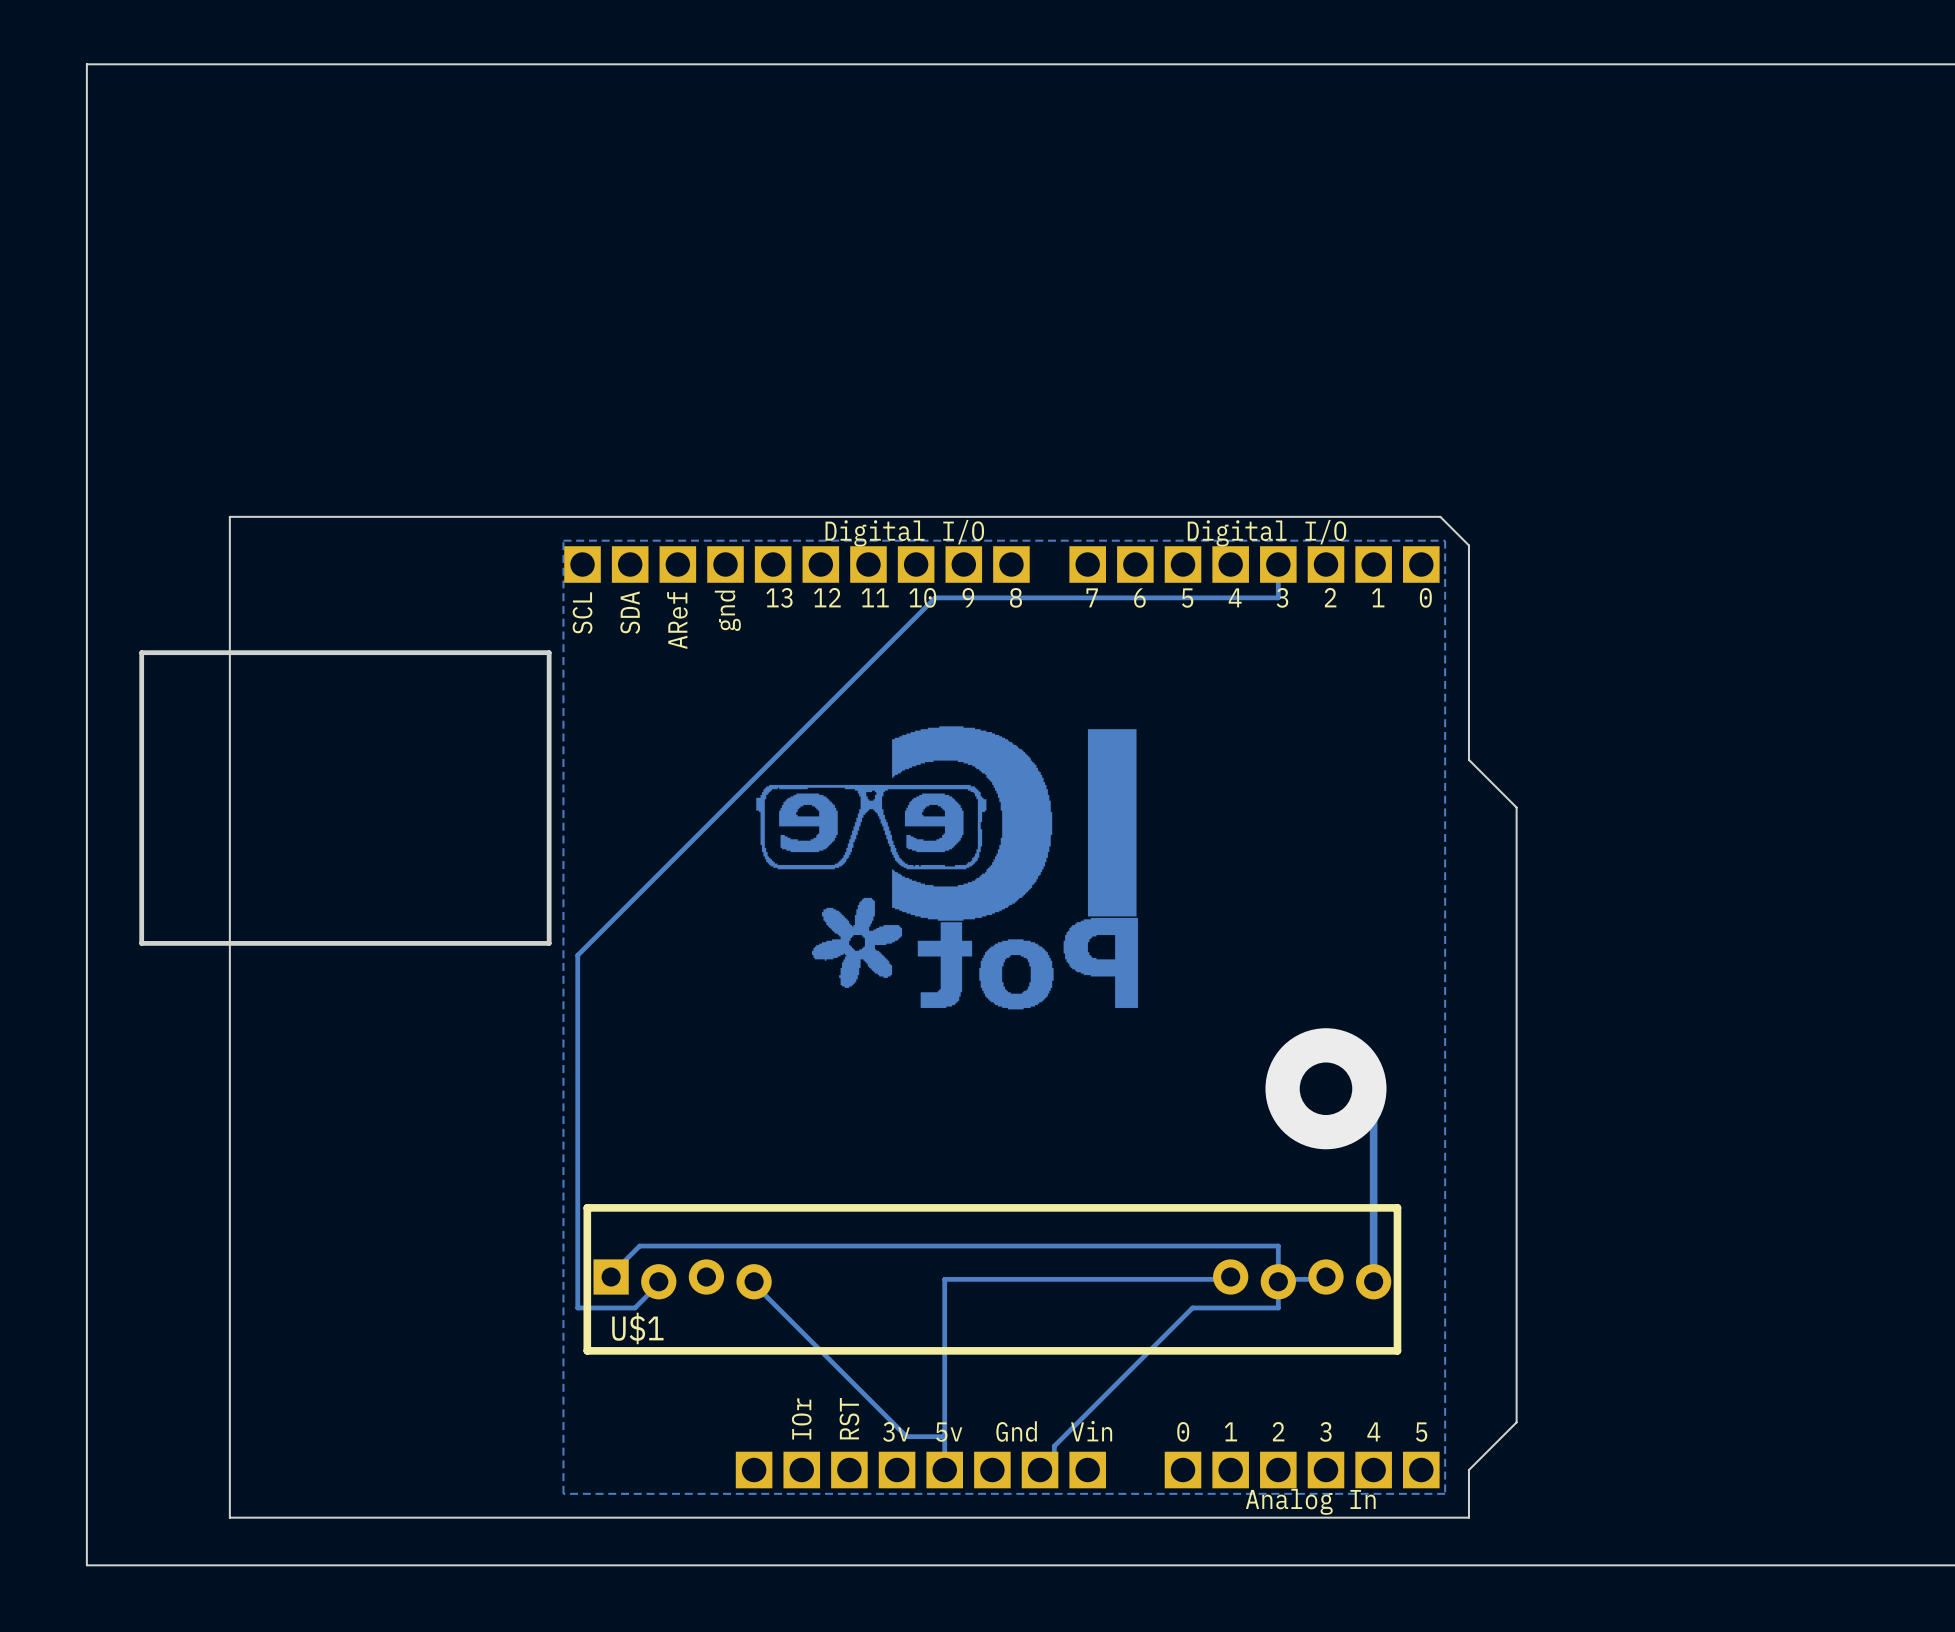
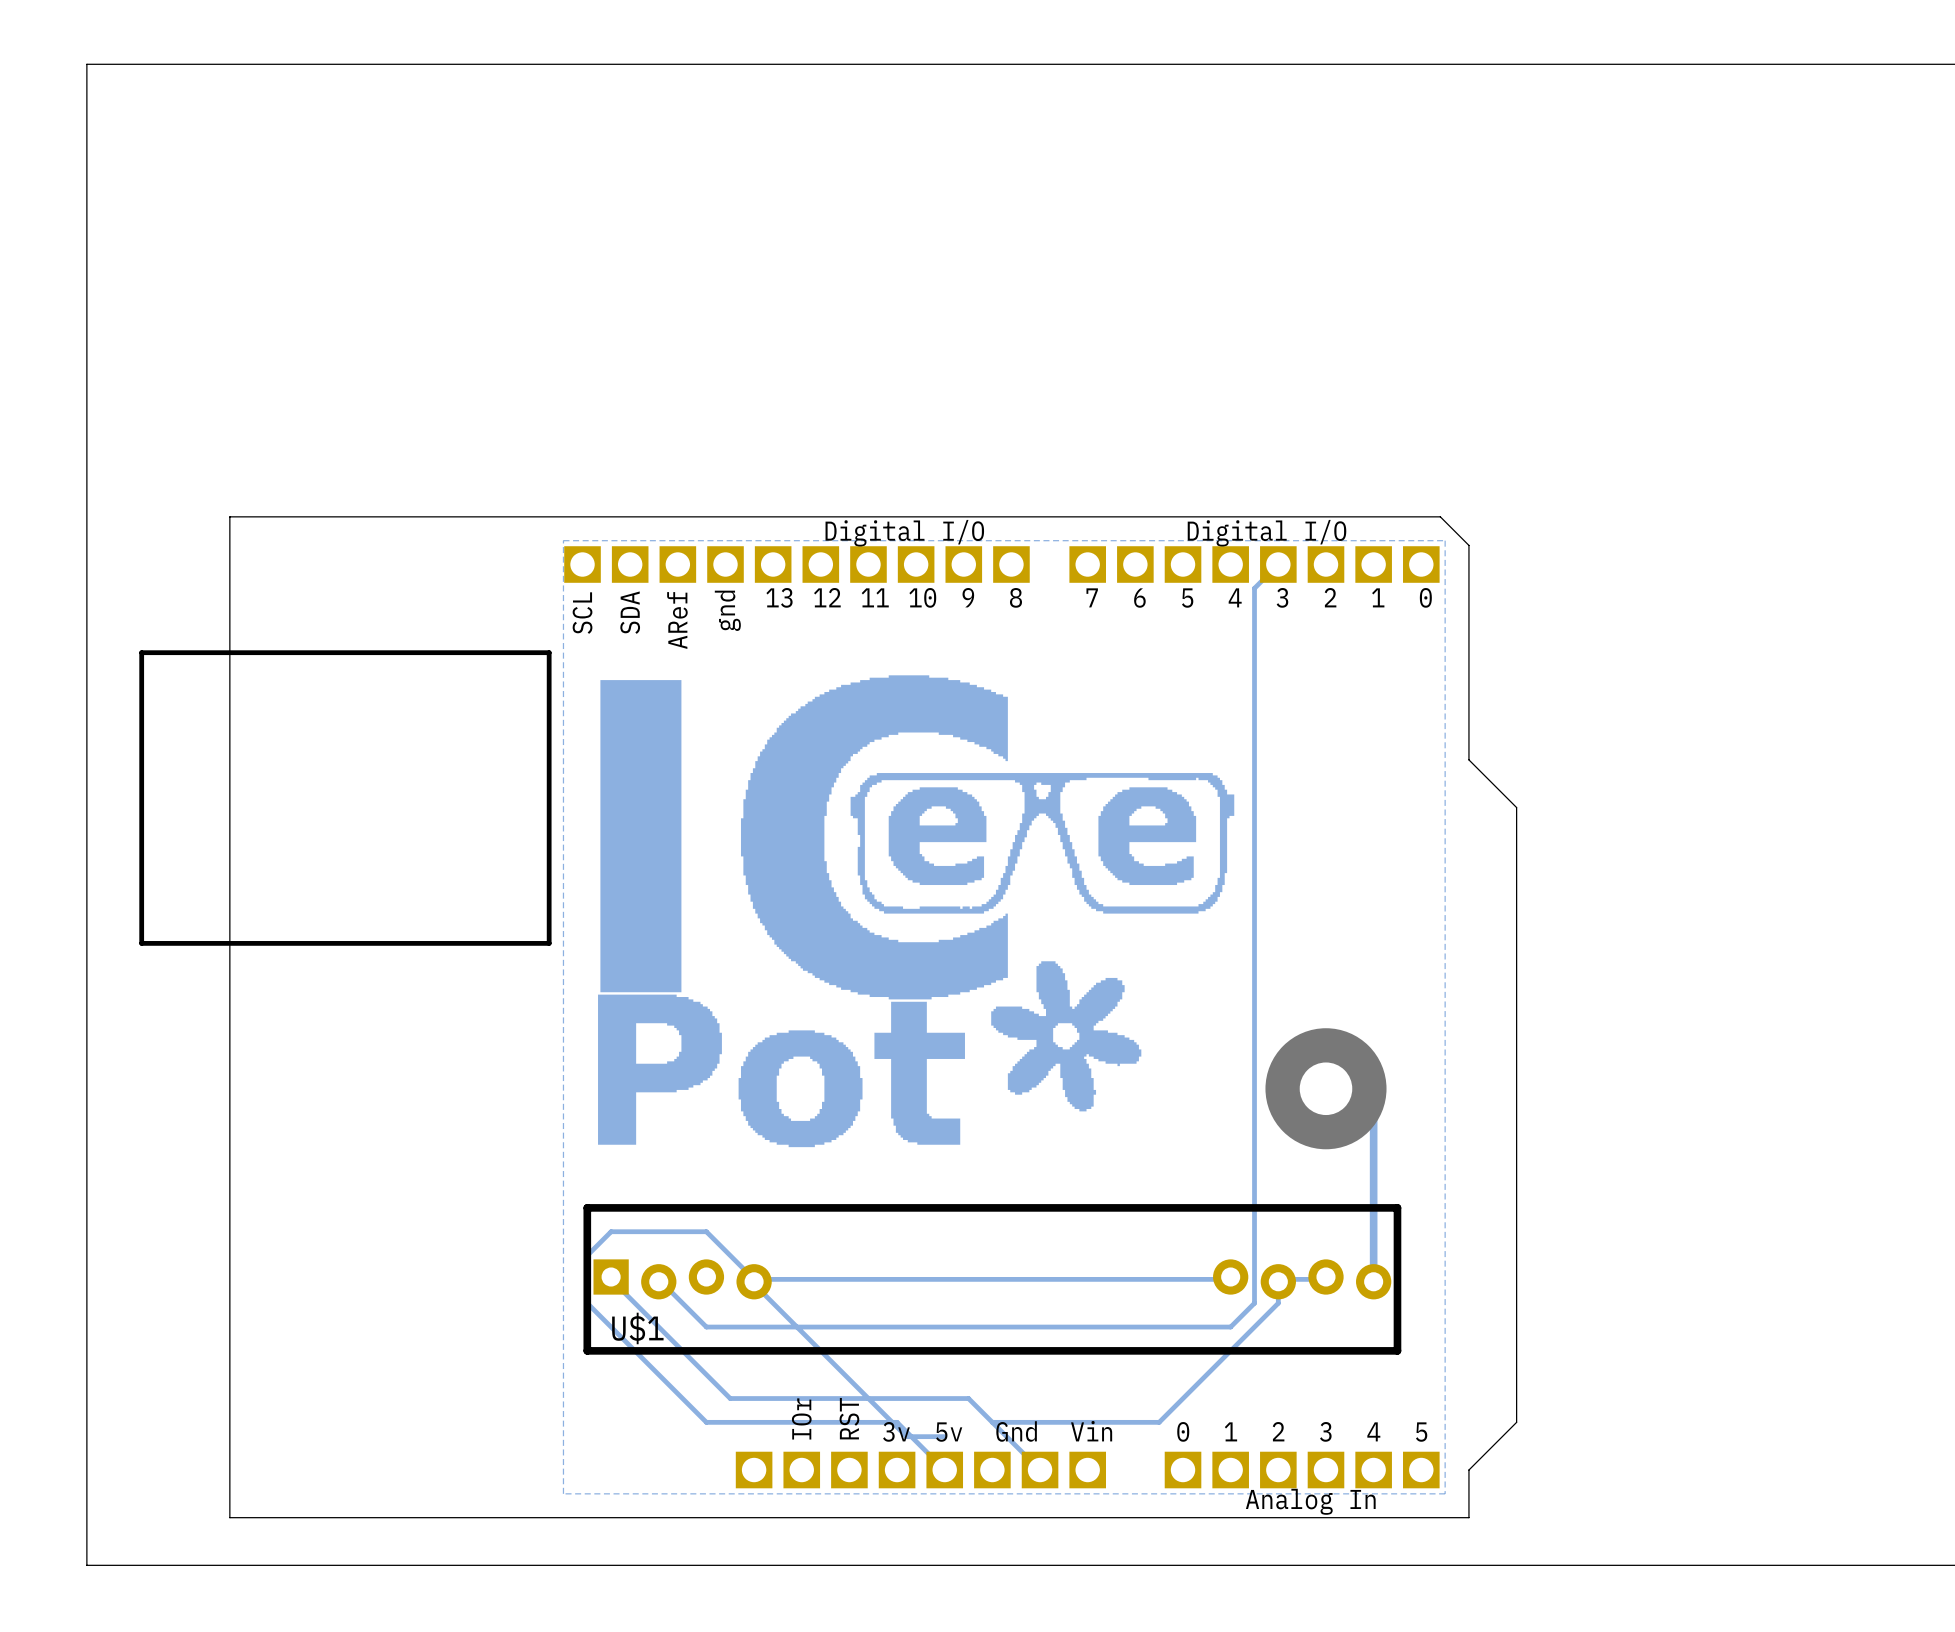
bottom track: (1278, 564) (1278, 597) (935, 597) (577, 955) (577, 1307) (634, 1307) (658, 1284) (658, 1281) -> (1278, 564) (1254, 588) (1254, 1303) (1230, 1327) (706, 1327) (658, 1279) (658, 1281)
drawing: none -> [598, 675, 1235, 1148]
drawing: [756, 726, 1138, 1010] -> none
bottom track: (611, 1277) (611, 1274) (639, 1246) (1278, 1246) (1278, 1279) -> (611, 1277) (611, 1279) (730, 1398) (968, 1398) (1040, 1470)
bottom track: (944, 1279) (944, 1470) -> (944, 1279) (754, 1279) (706, 1231) (611, 1231) (587, 1255) (587, 1303) (706, 1422) (897, 1422) (944, 1470)
bottom track: (1278, 1303) (1278, 1307) (1192, 1307) (1054, 1446) (1054, 1455) (1040, 1470) -> (1278, 1303) (1159, 1422) (992, 1422)

